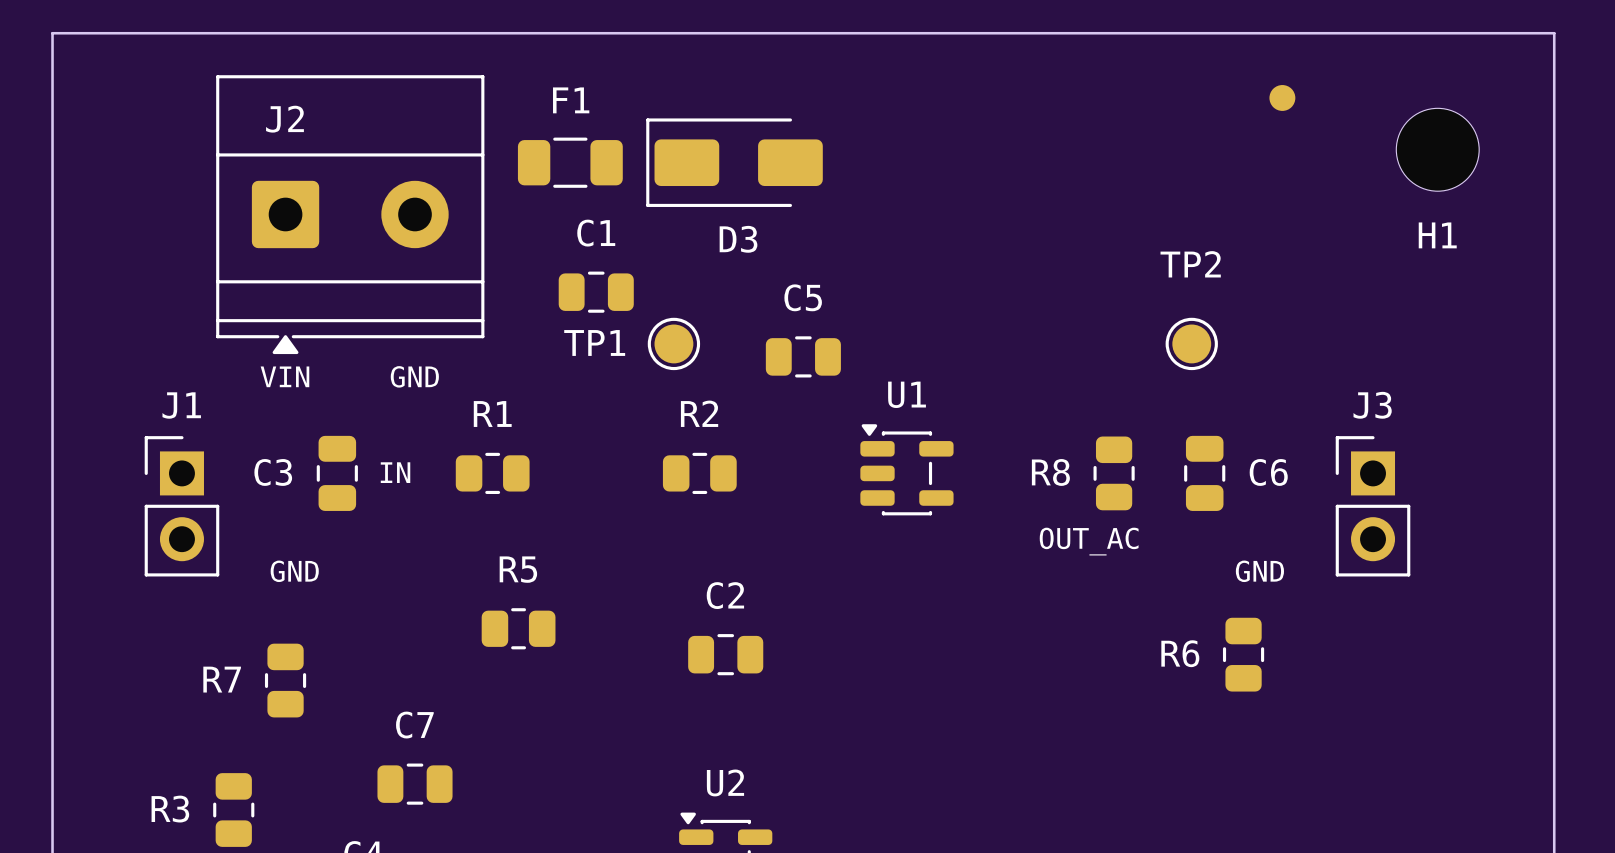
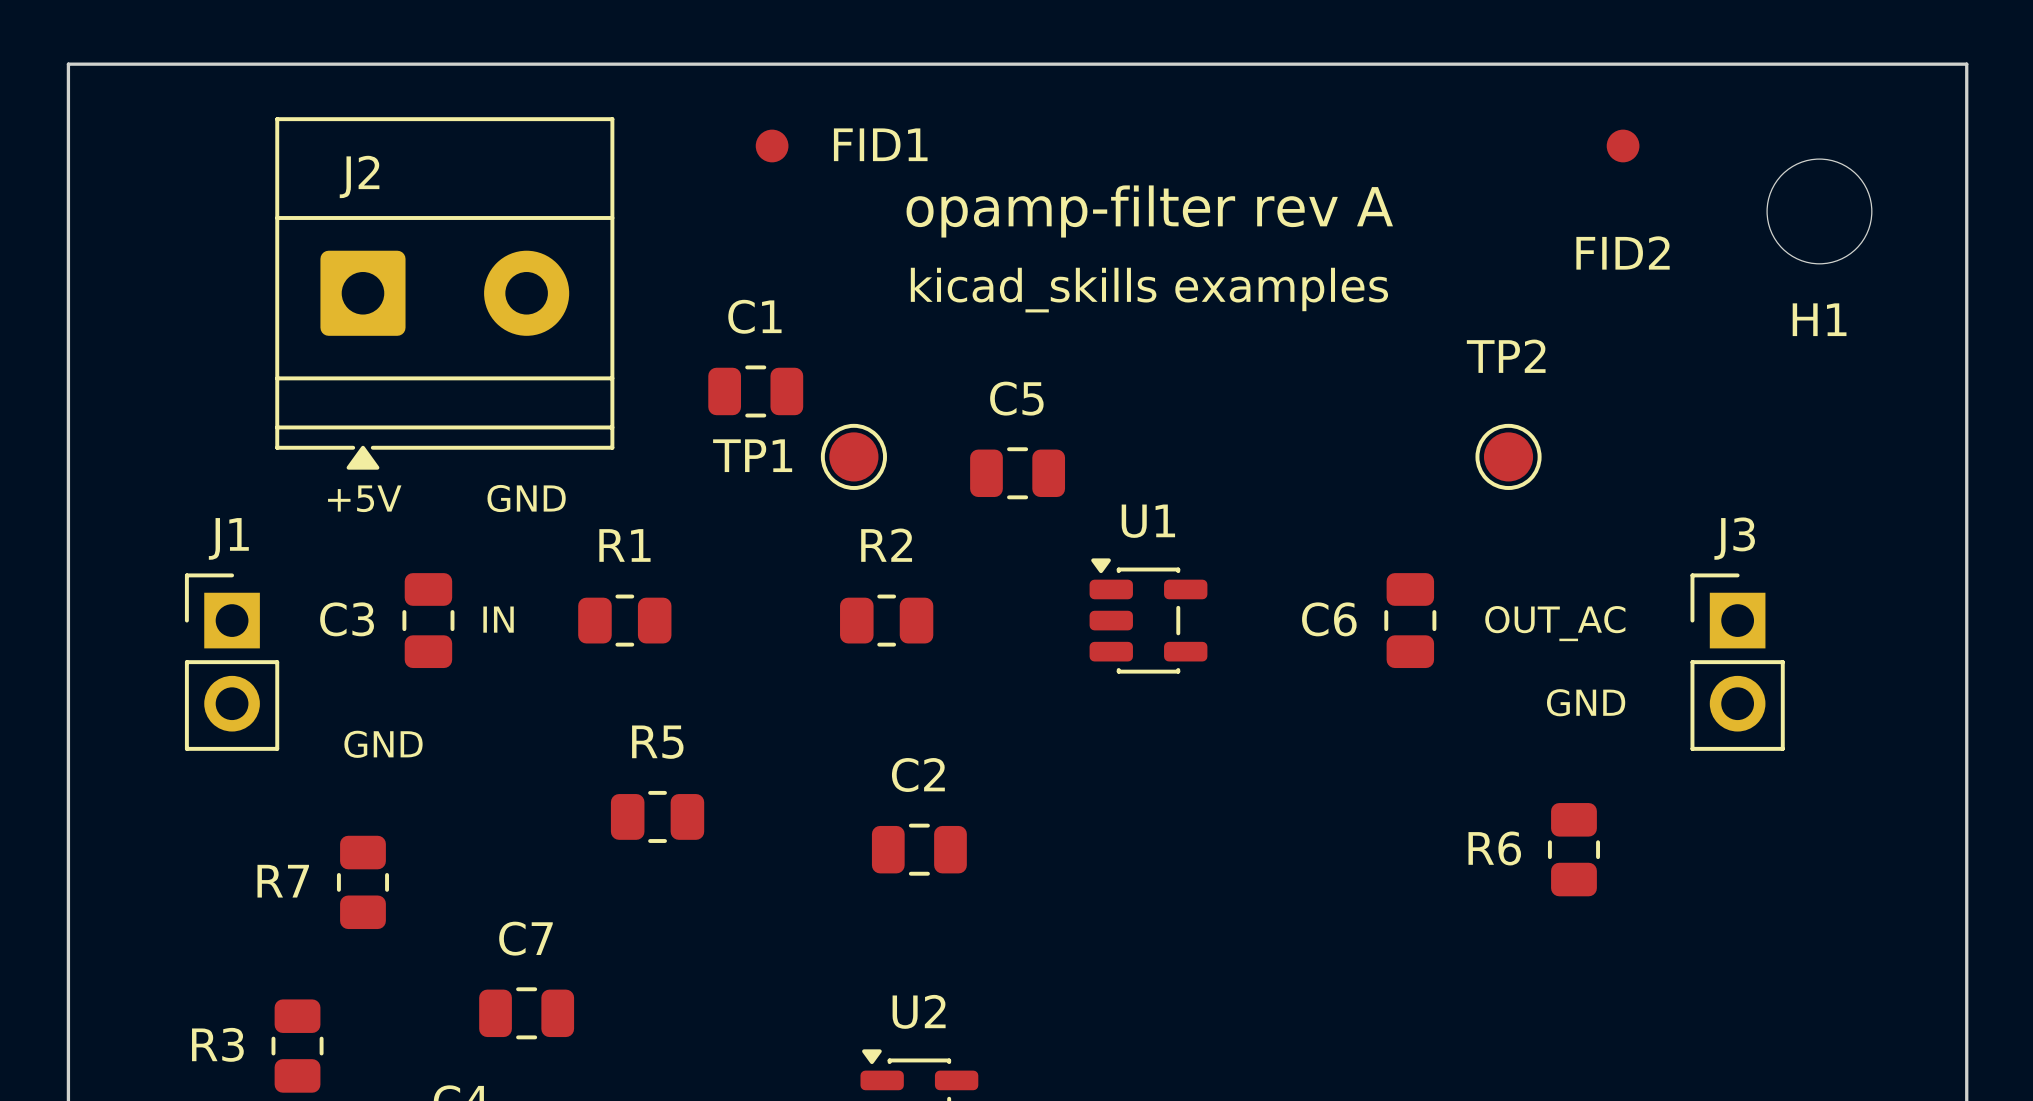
FID1: none -> (772, 145)
text: none -> opamp-filter rev A (1149, 211)
F1: (570, 162) -> none
D3: (734, 162) -> none
FID2 name: none -> FID2 (1623, 252)
text: none -> kicad_skills examples (1149, 290)
text: VIN (284, 376) -> +5V (364, 498)
C6 name position: C6 (1268, 472) -> C6 (1329, 619)
R8: (1114, 473) -> none
C6 position: (1204, 473) -> (1410, 620)
text position: OUT_AC (1089, 541) -> OUT_AC (1555, 623)
text position: GND (1259, 571) -> GND (1586, 702)

